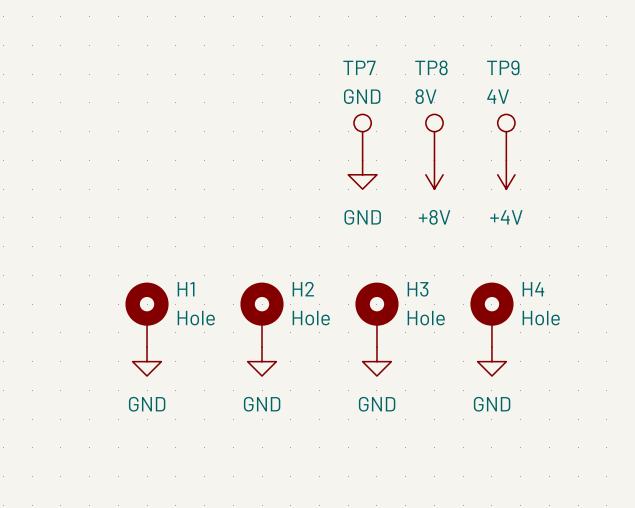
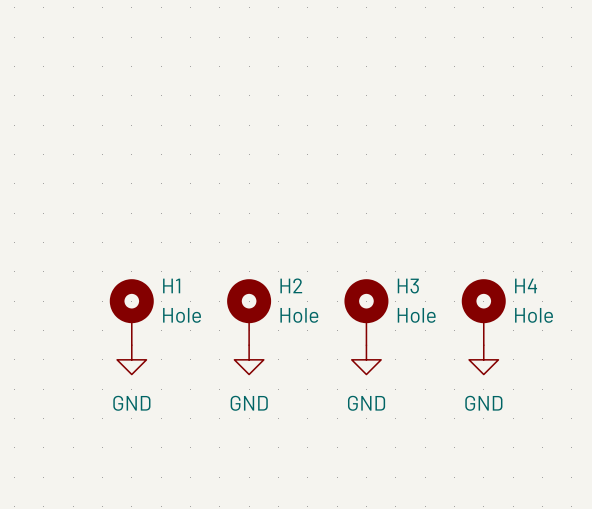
TP7: GND (362, 137) -> none
TP8: 8V (434, 137) -> none
TP9: 4V (506, 137) -> none
power symbol: GND (362, 174) -> none
power symbol: +8V (434, 174) -> none
power symbol: +4V (506, 174) -> none

